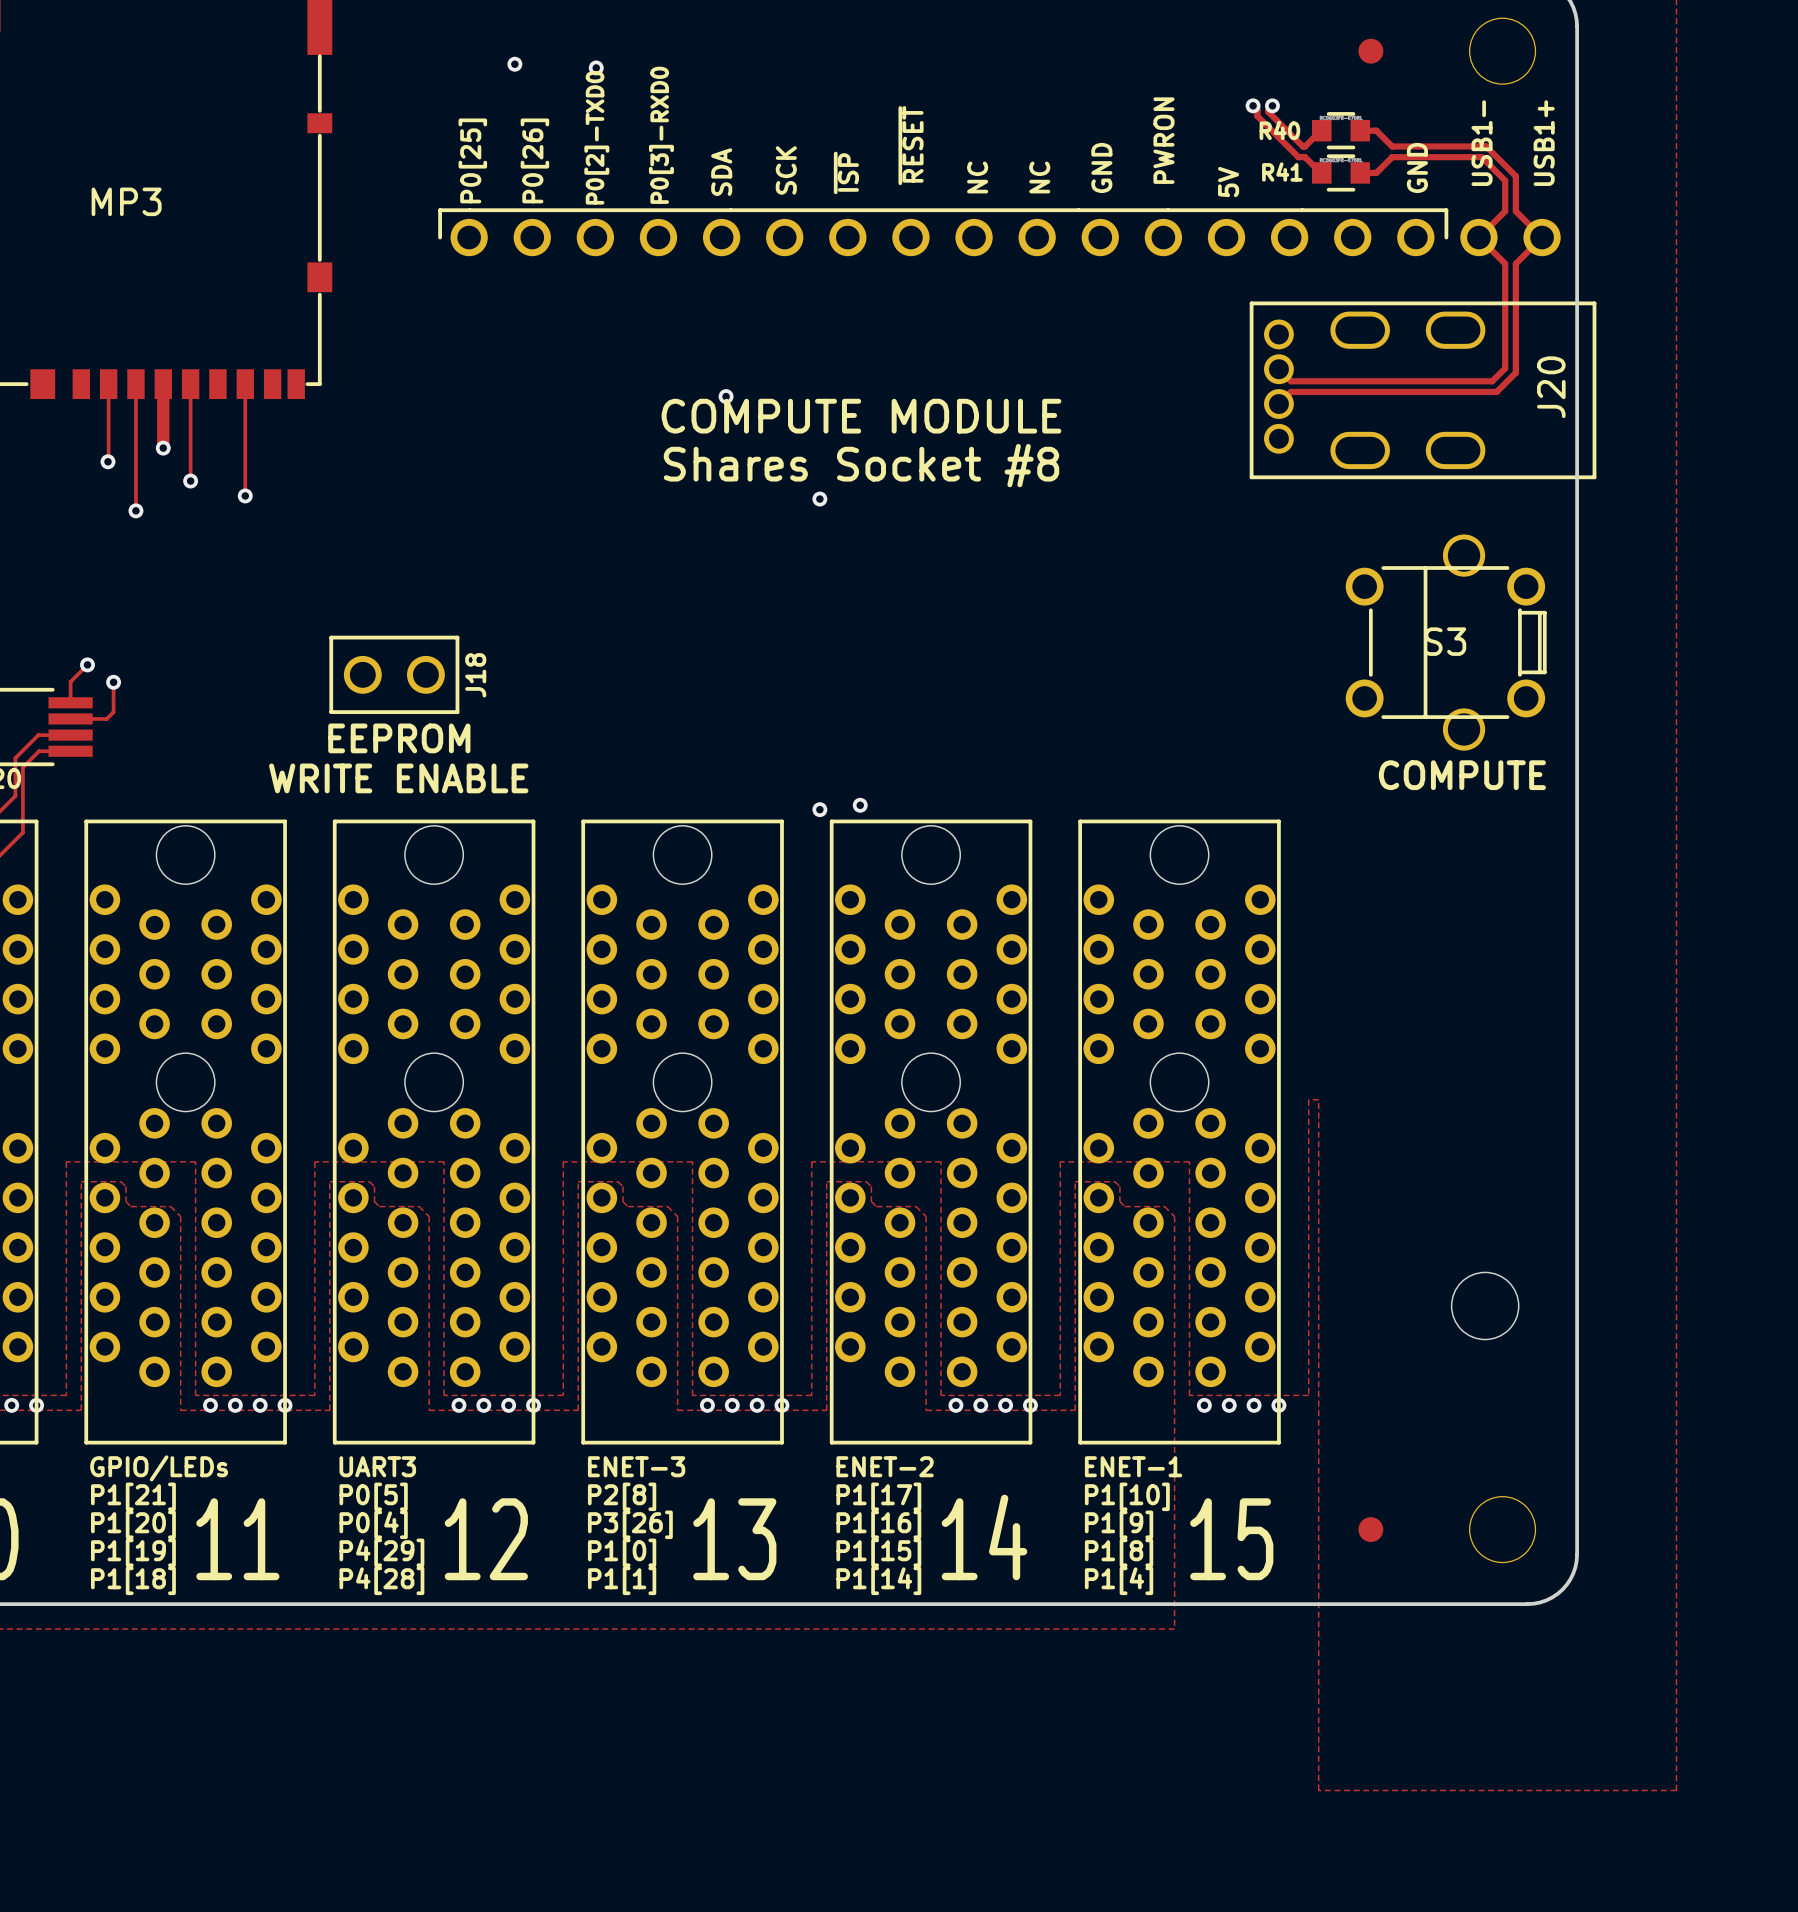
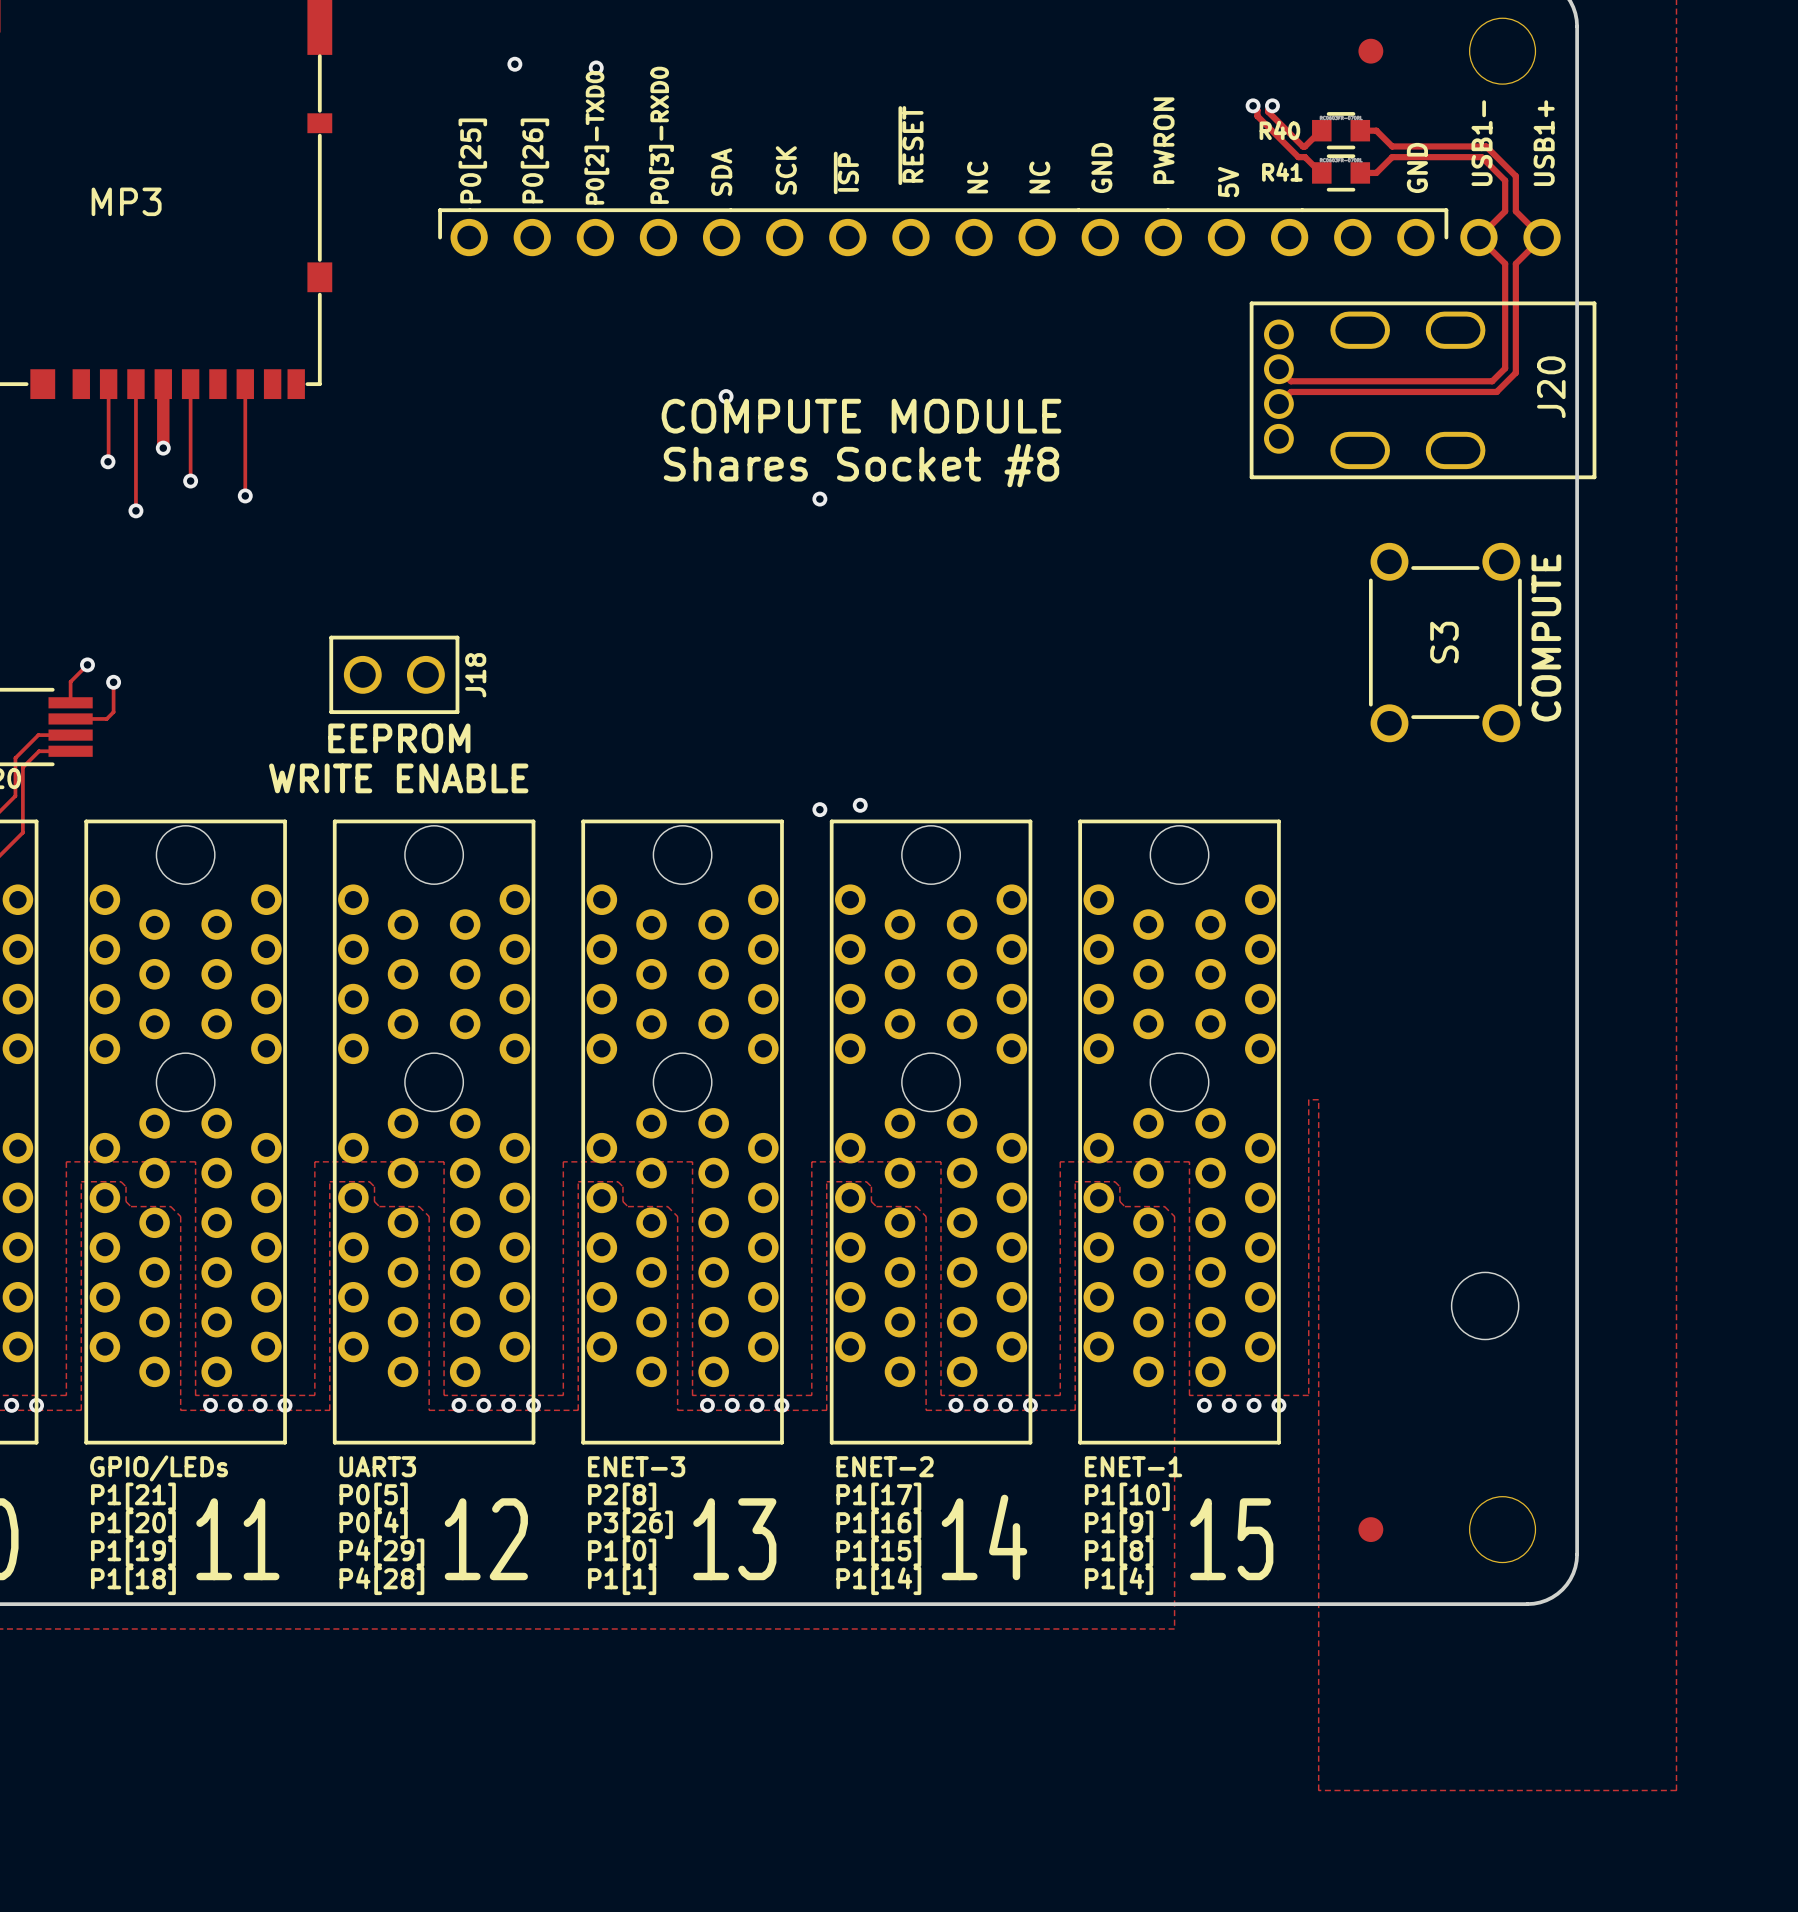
S3 footprint: [1345, 534, 1547, 751] -> [1369, 542, 1522, 743]
text rotation: 0° (1462, 775) -> 90° counterclockwise (1546, 637)

